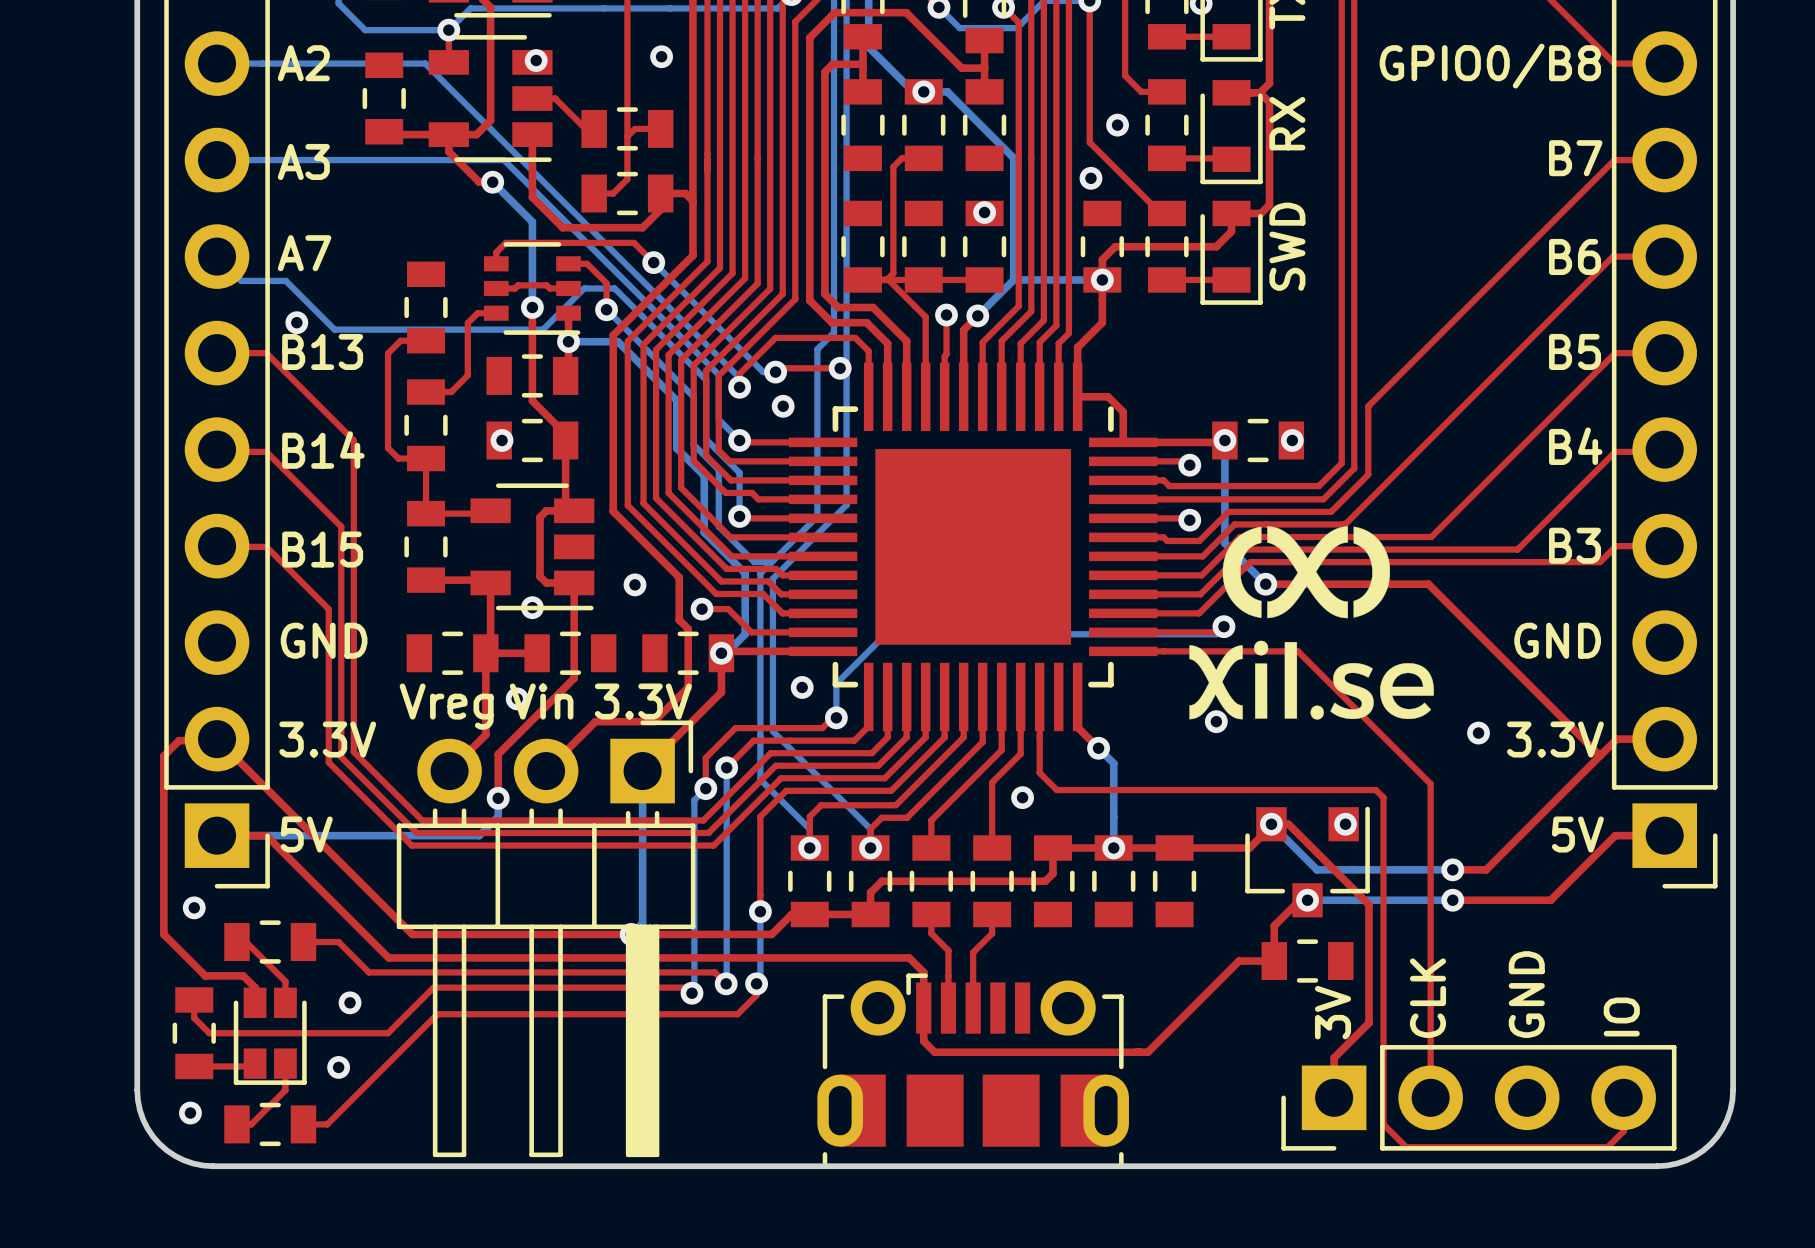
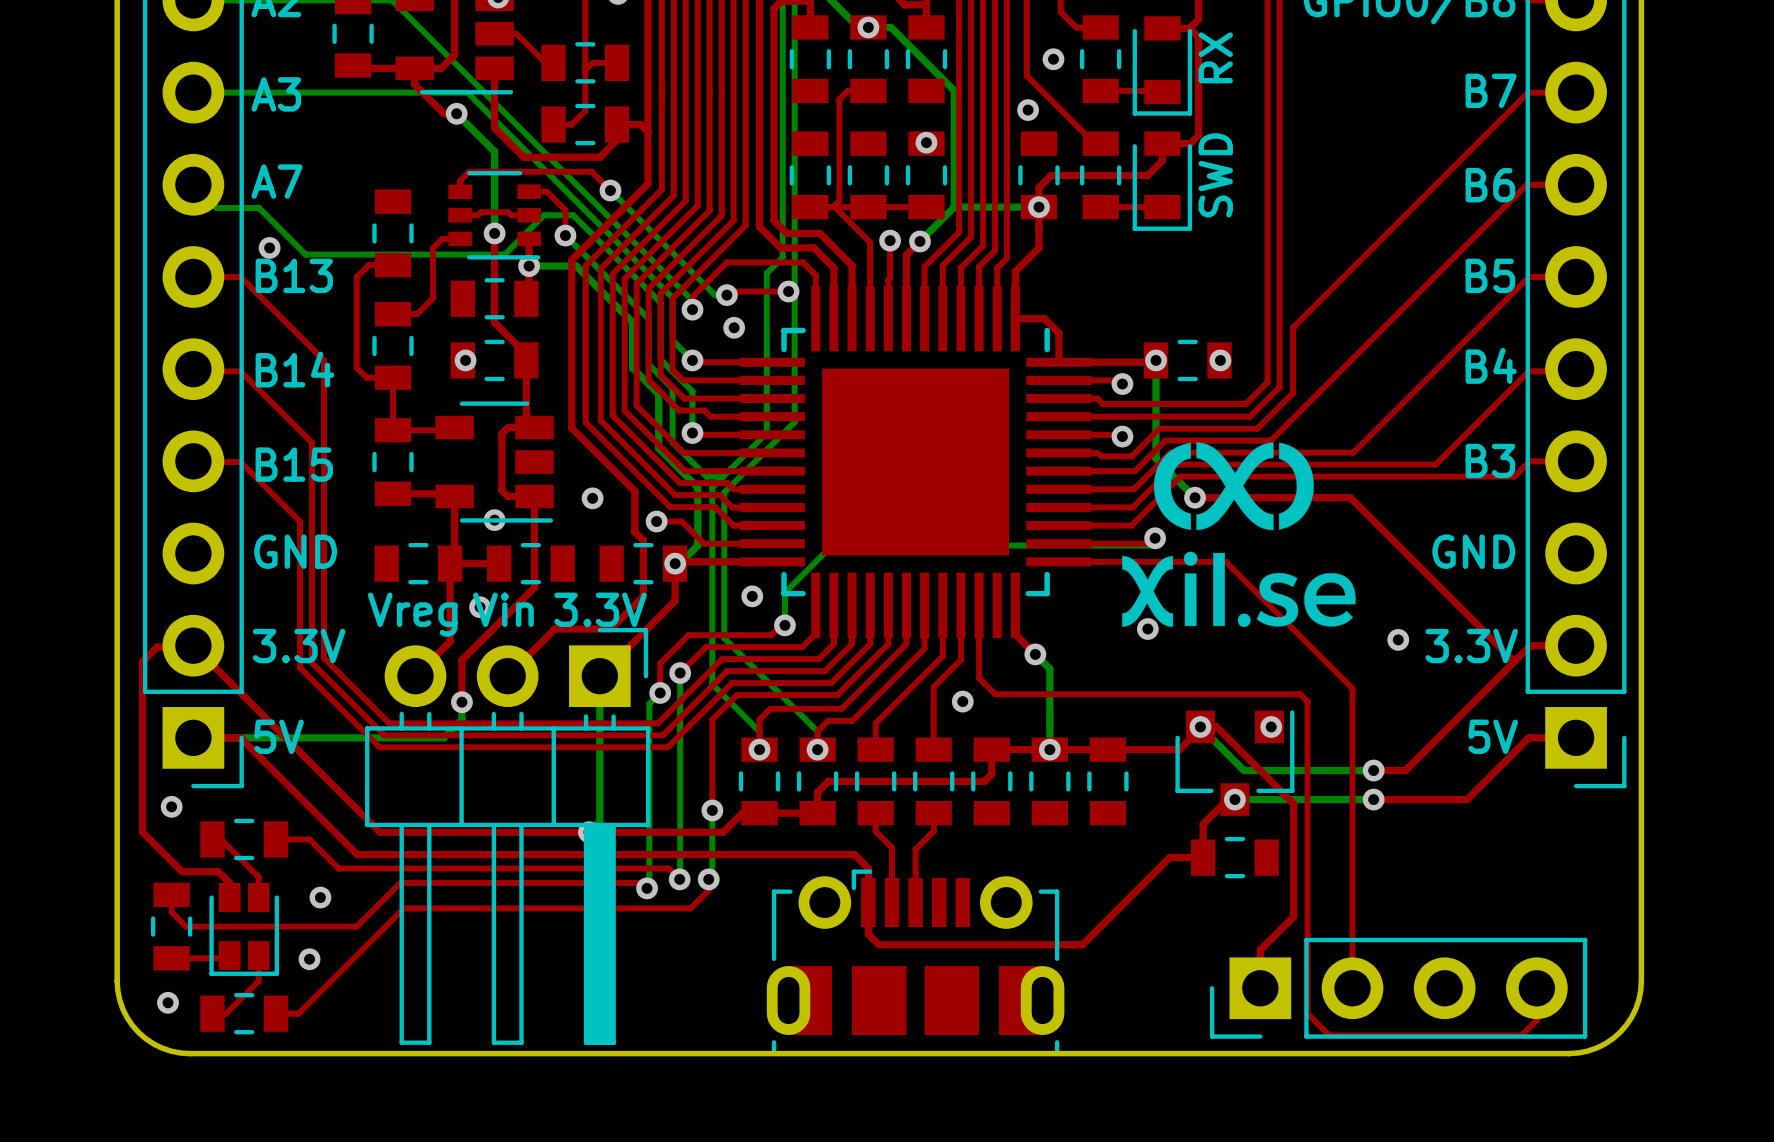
text: GND (1526, 994) -> none
text: CLK (1427, 998) -> none
text: 3V (1333, 1012) -> none
text: IO (1621, 1016) -> none

